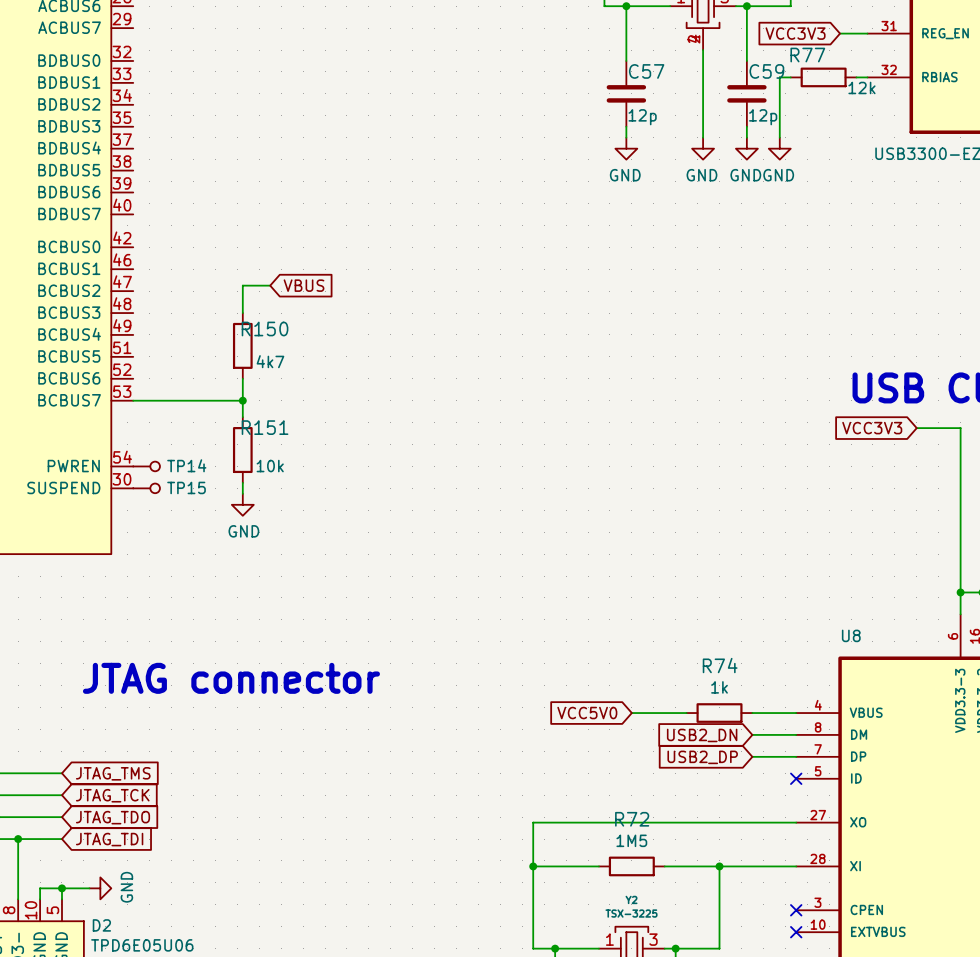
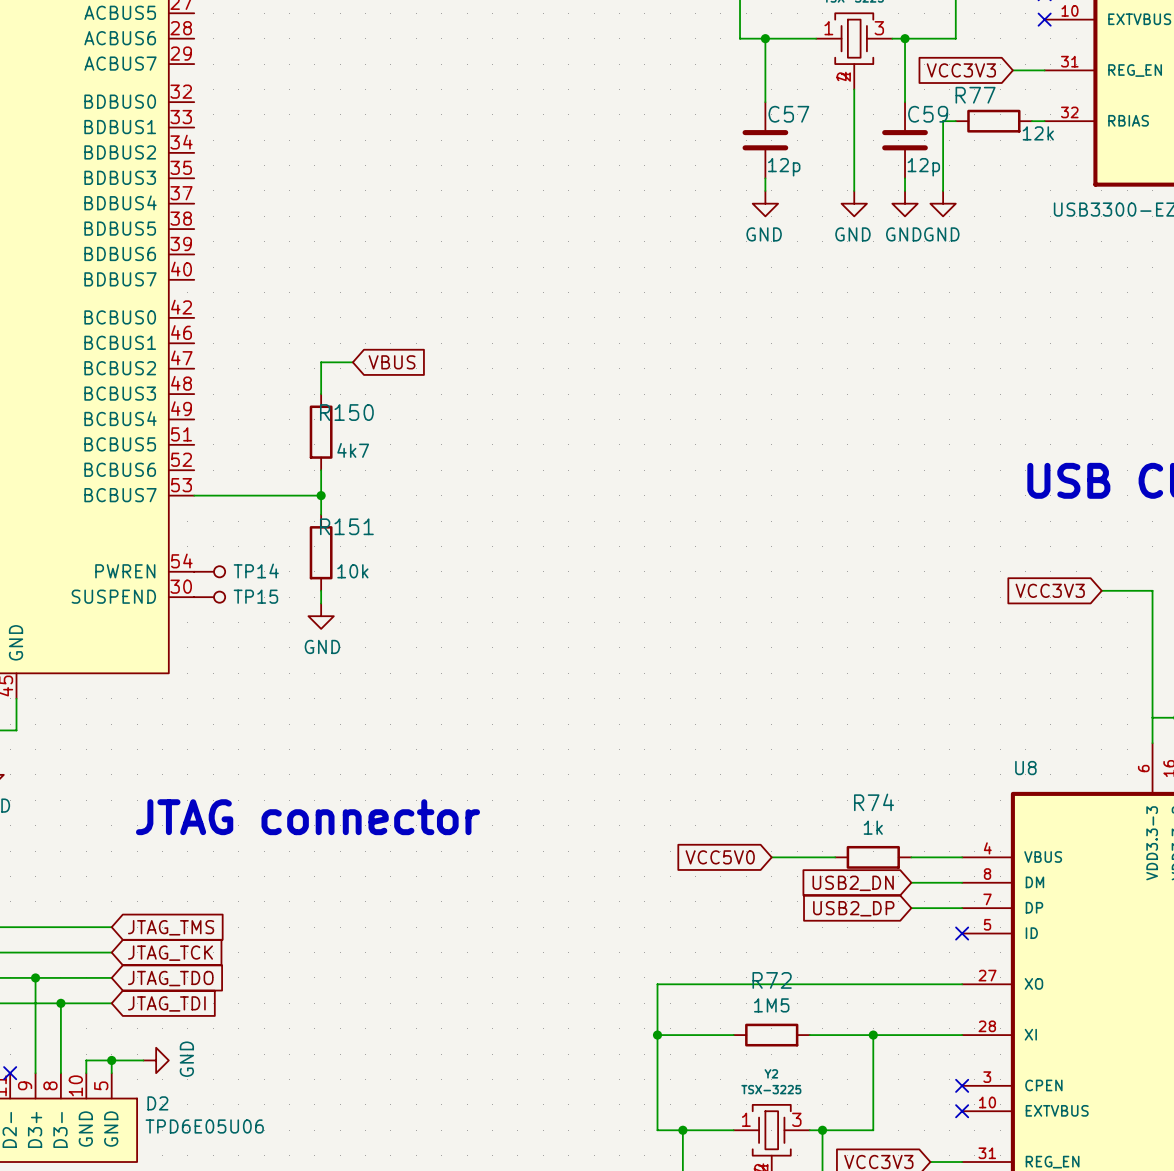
global label position: VCC3V3 (872, 428) -> VCC3V3 (1050, 590)
wire: (916, 428) (960, 428) (960, 482) -> (1101, 590) (1152, 590)
junction: (960, 592) -> none

